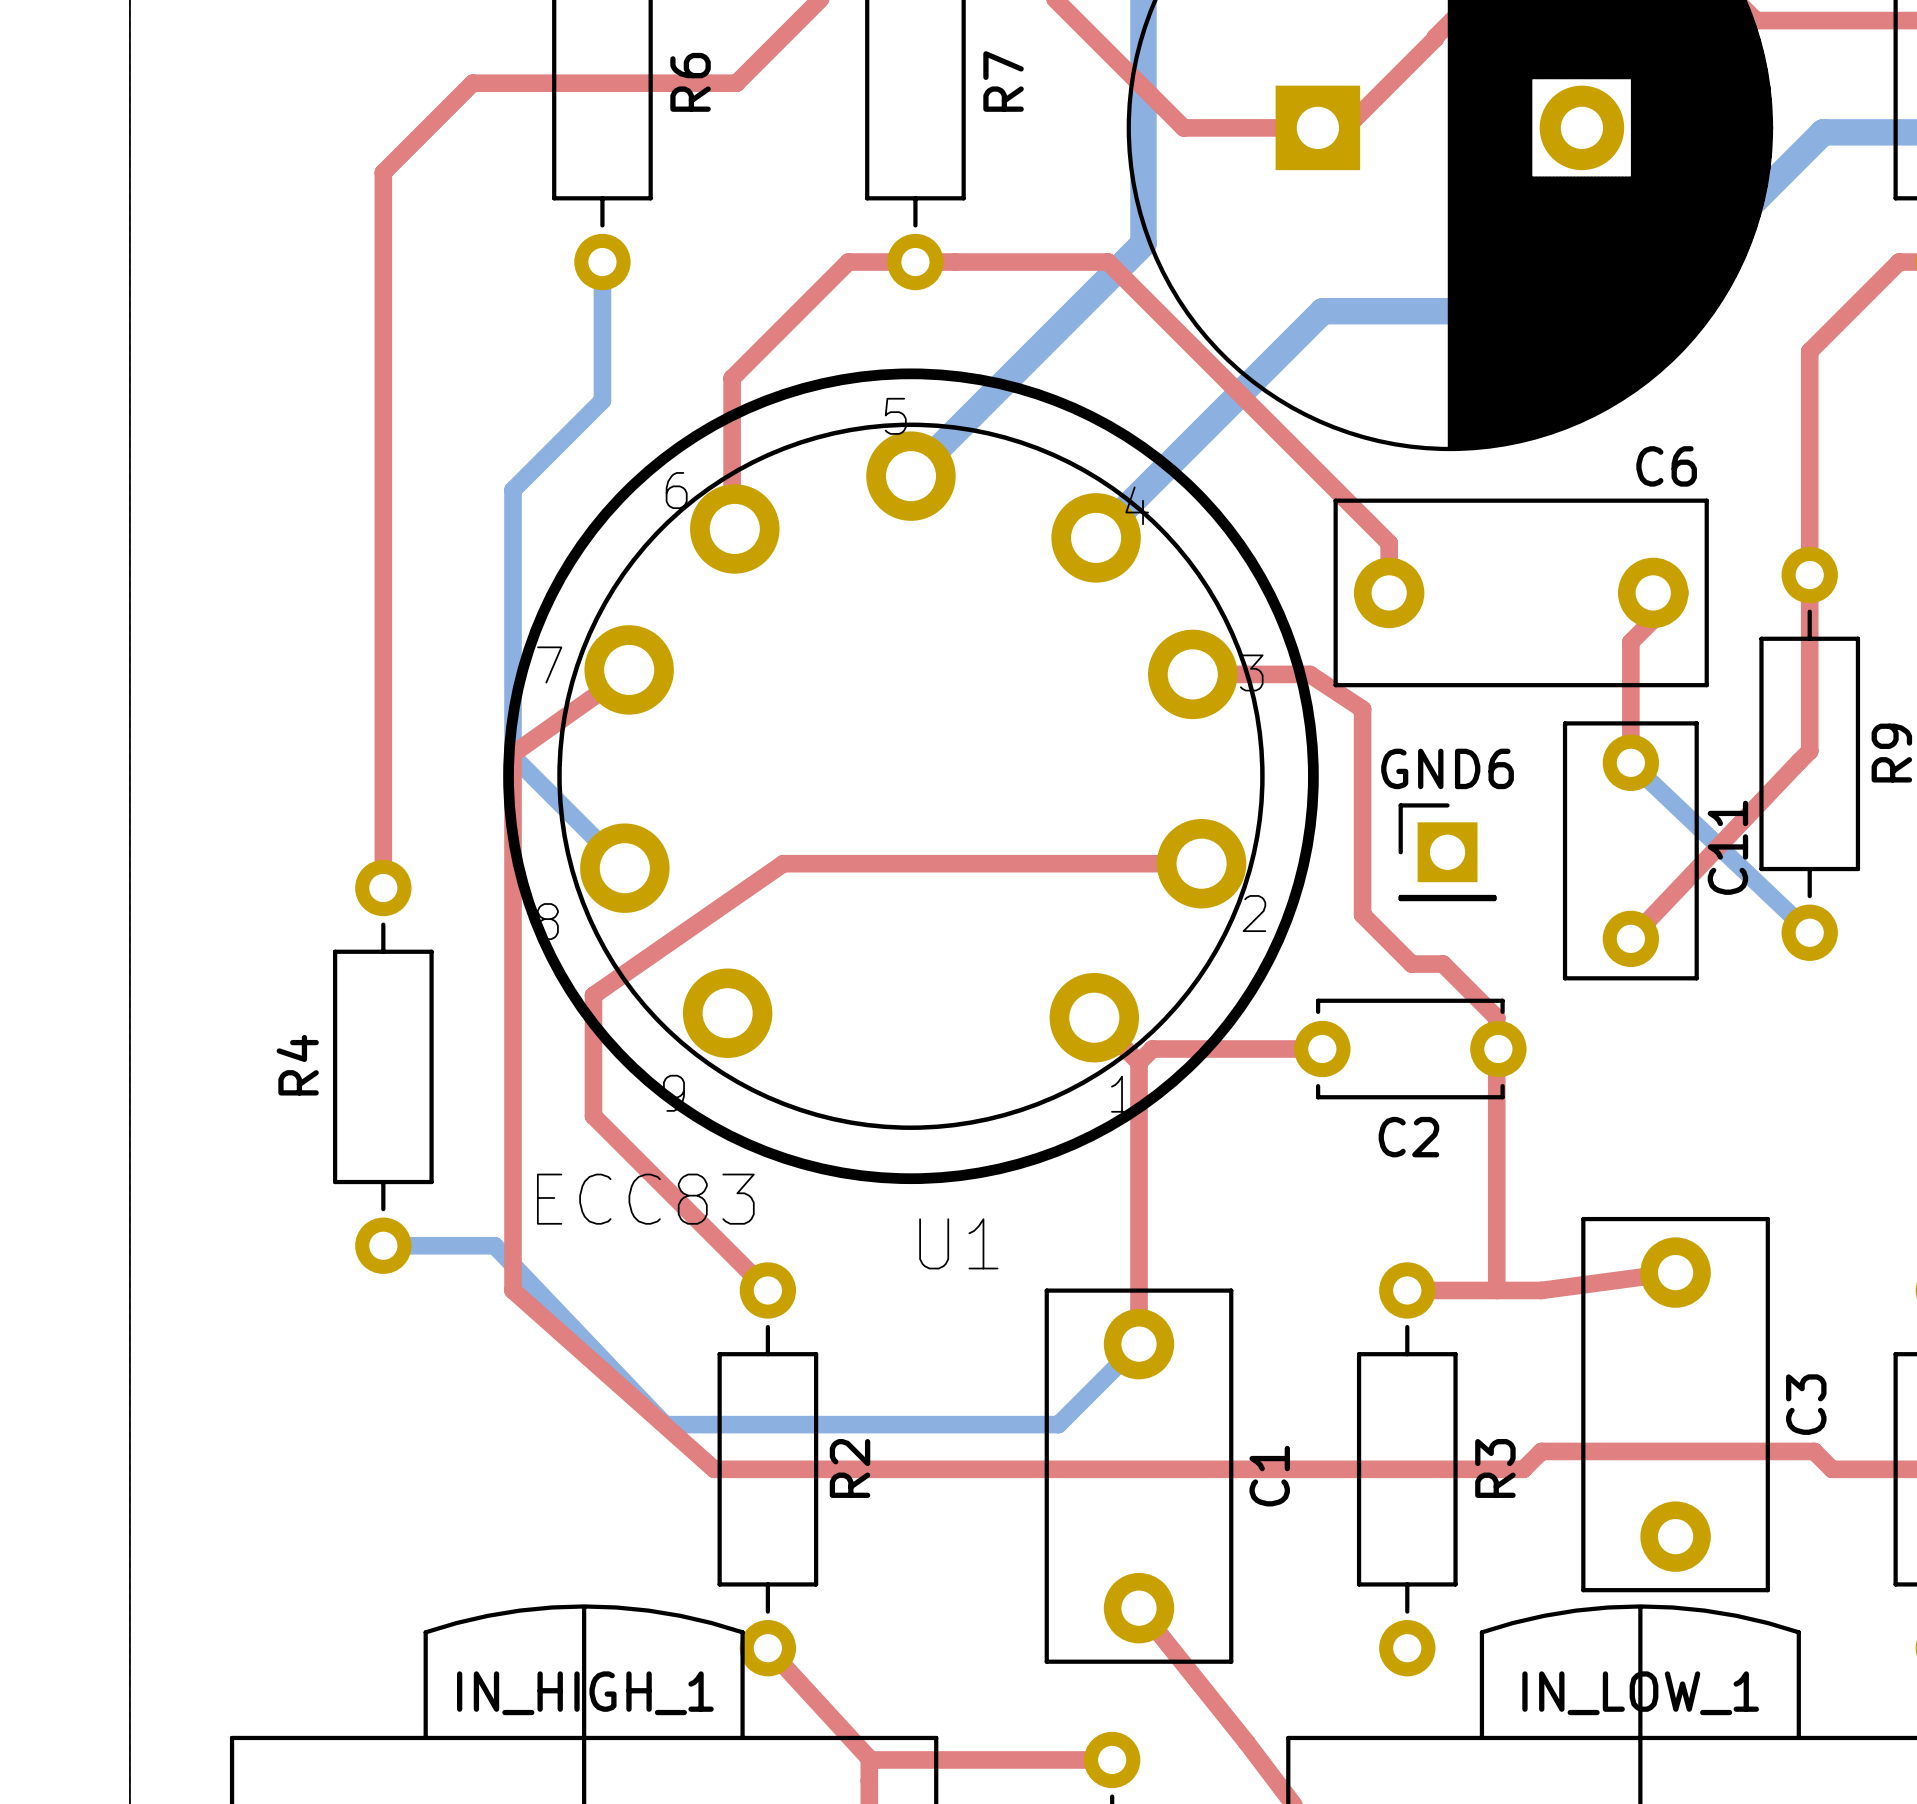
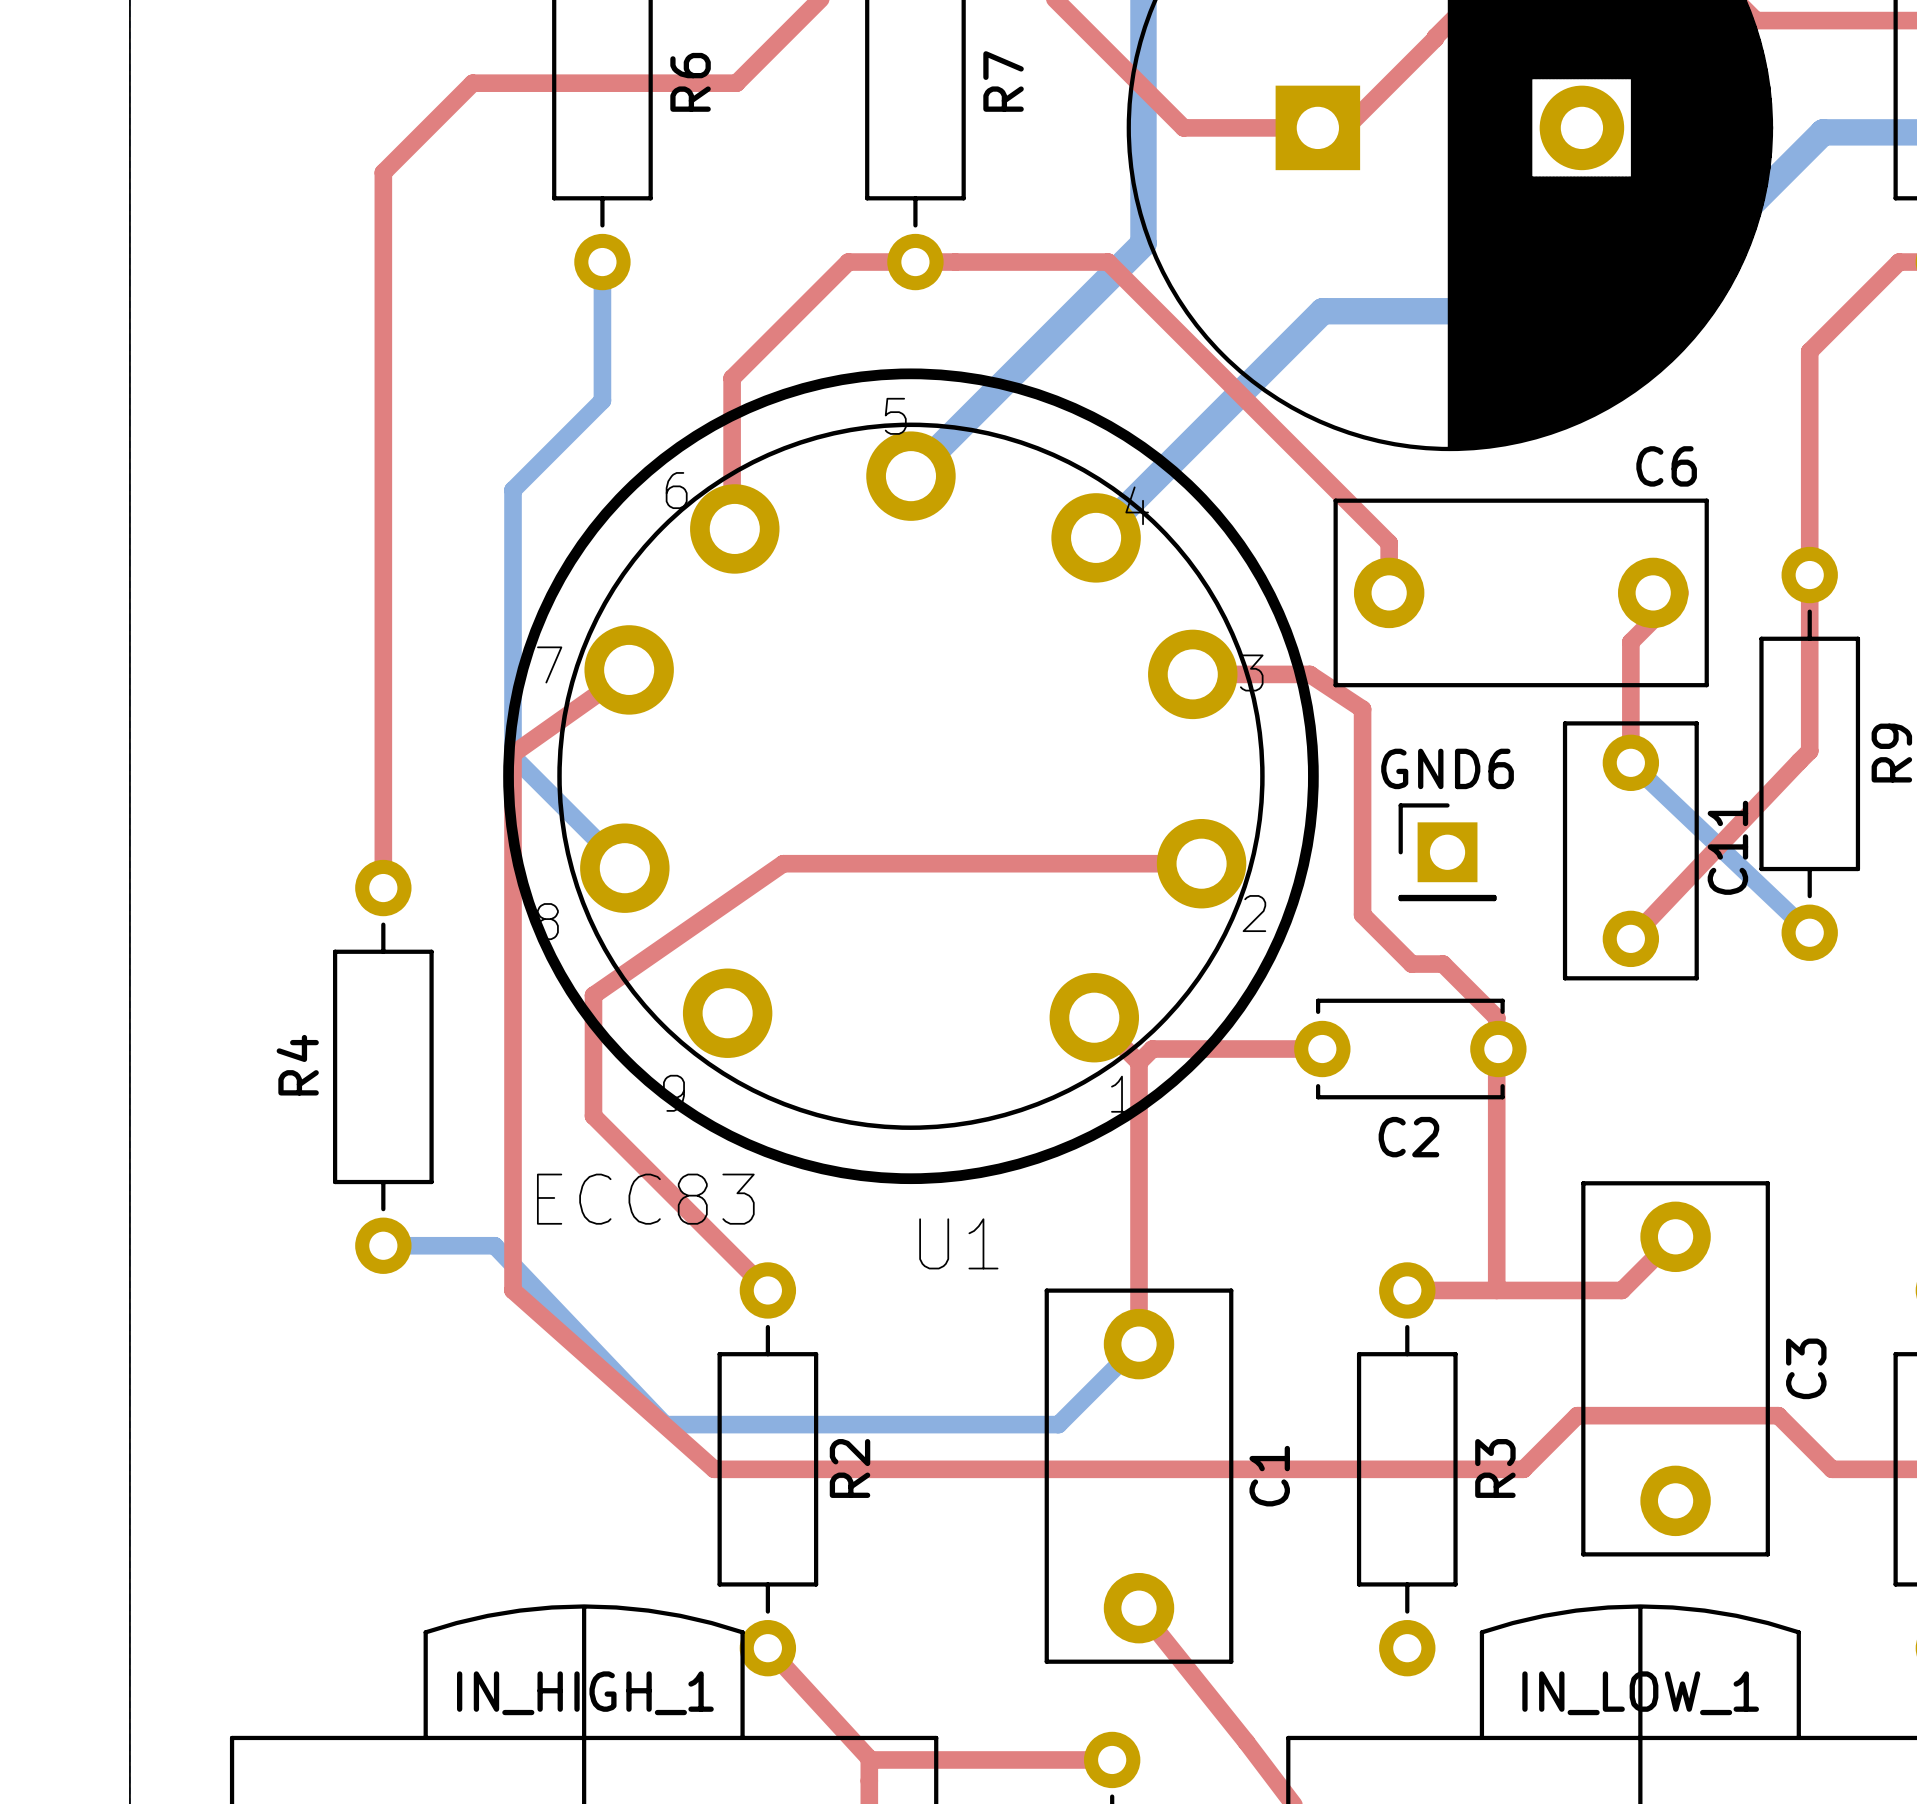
top track: (1675, 1272) (1541, 1290) -> (1675, 1236) (1621, 1290) (1541, 1290)
C3 position: (1675, 1404) -> (1675, 1368)
top track: (1541, 1451) (1814, 1451) -> (1541, 1451) (1577, 1415) (1778, 1415) (1814, 1451)

